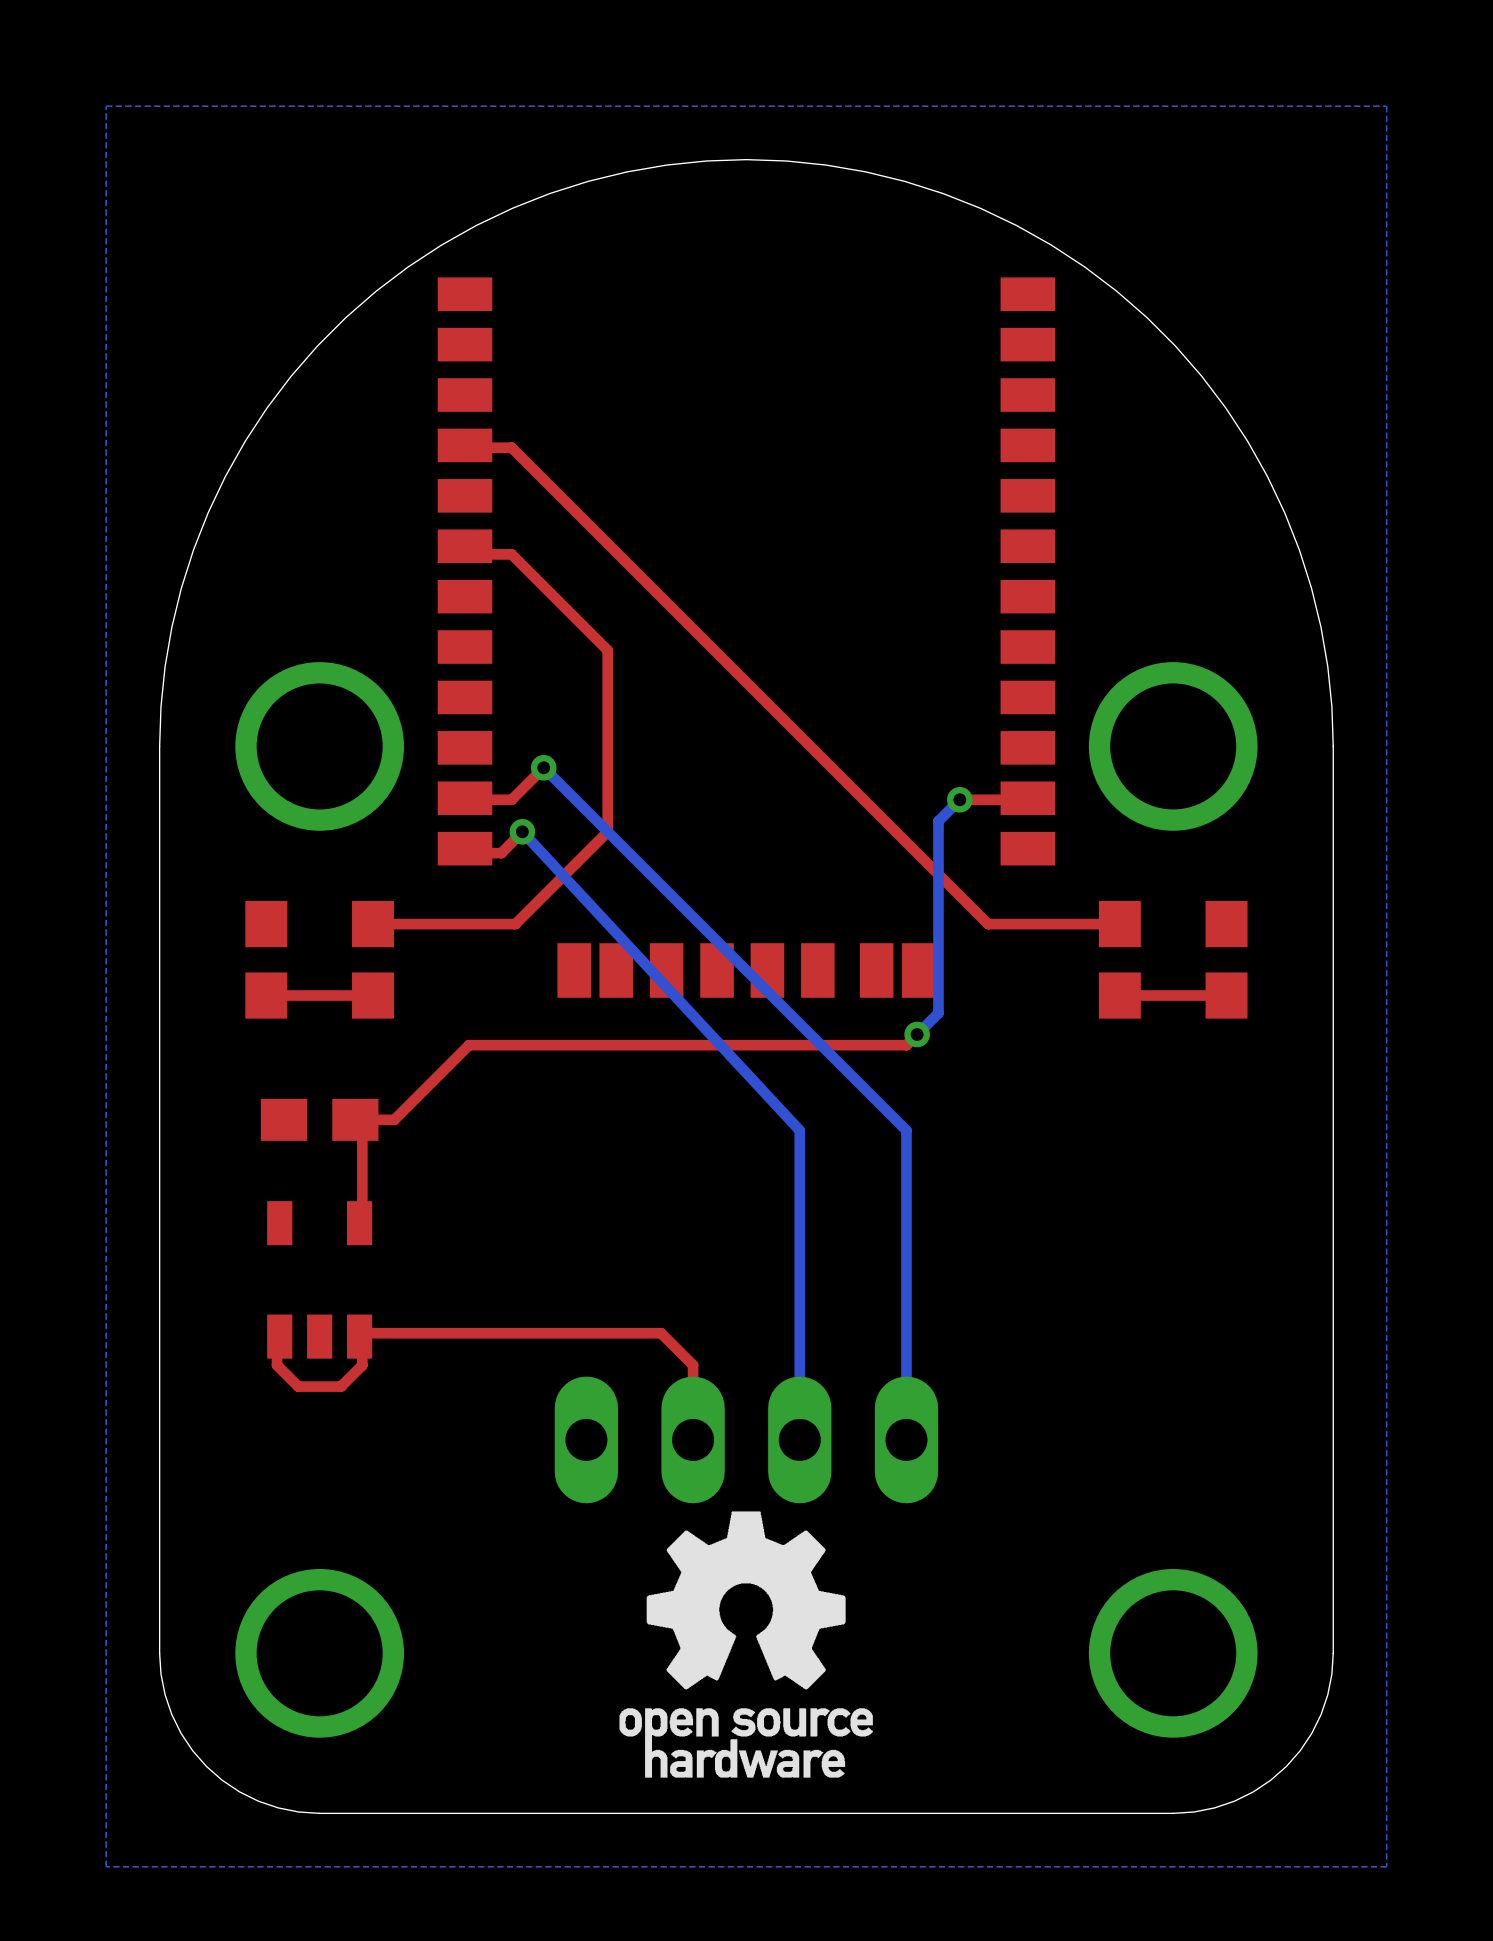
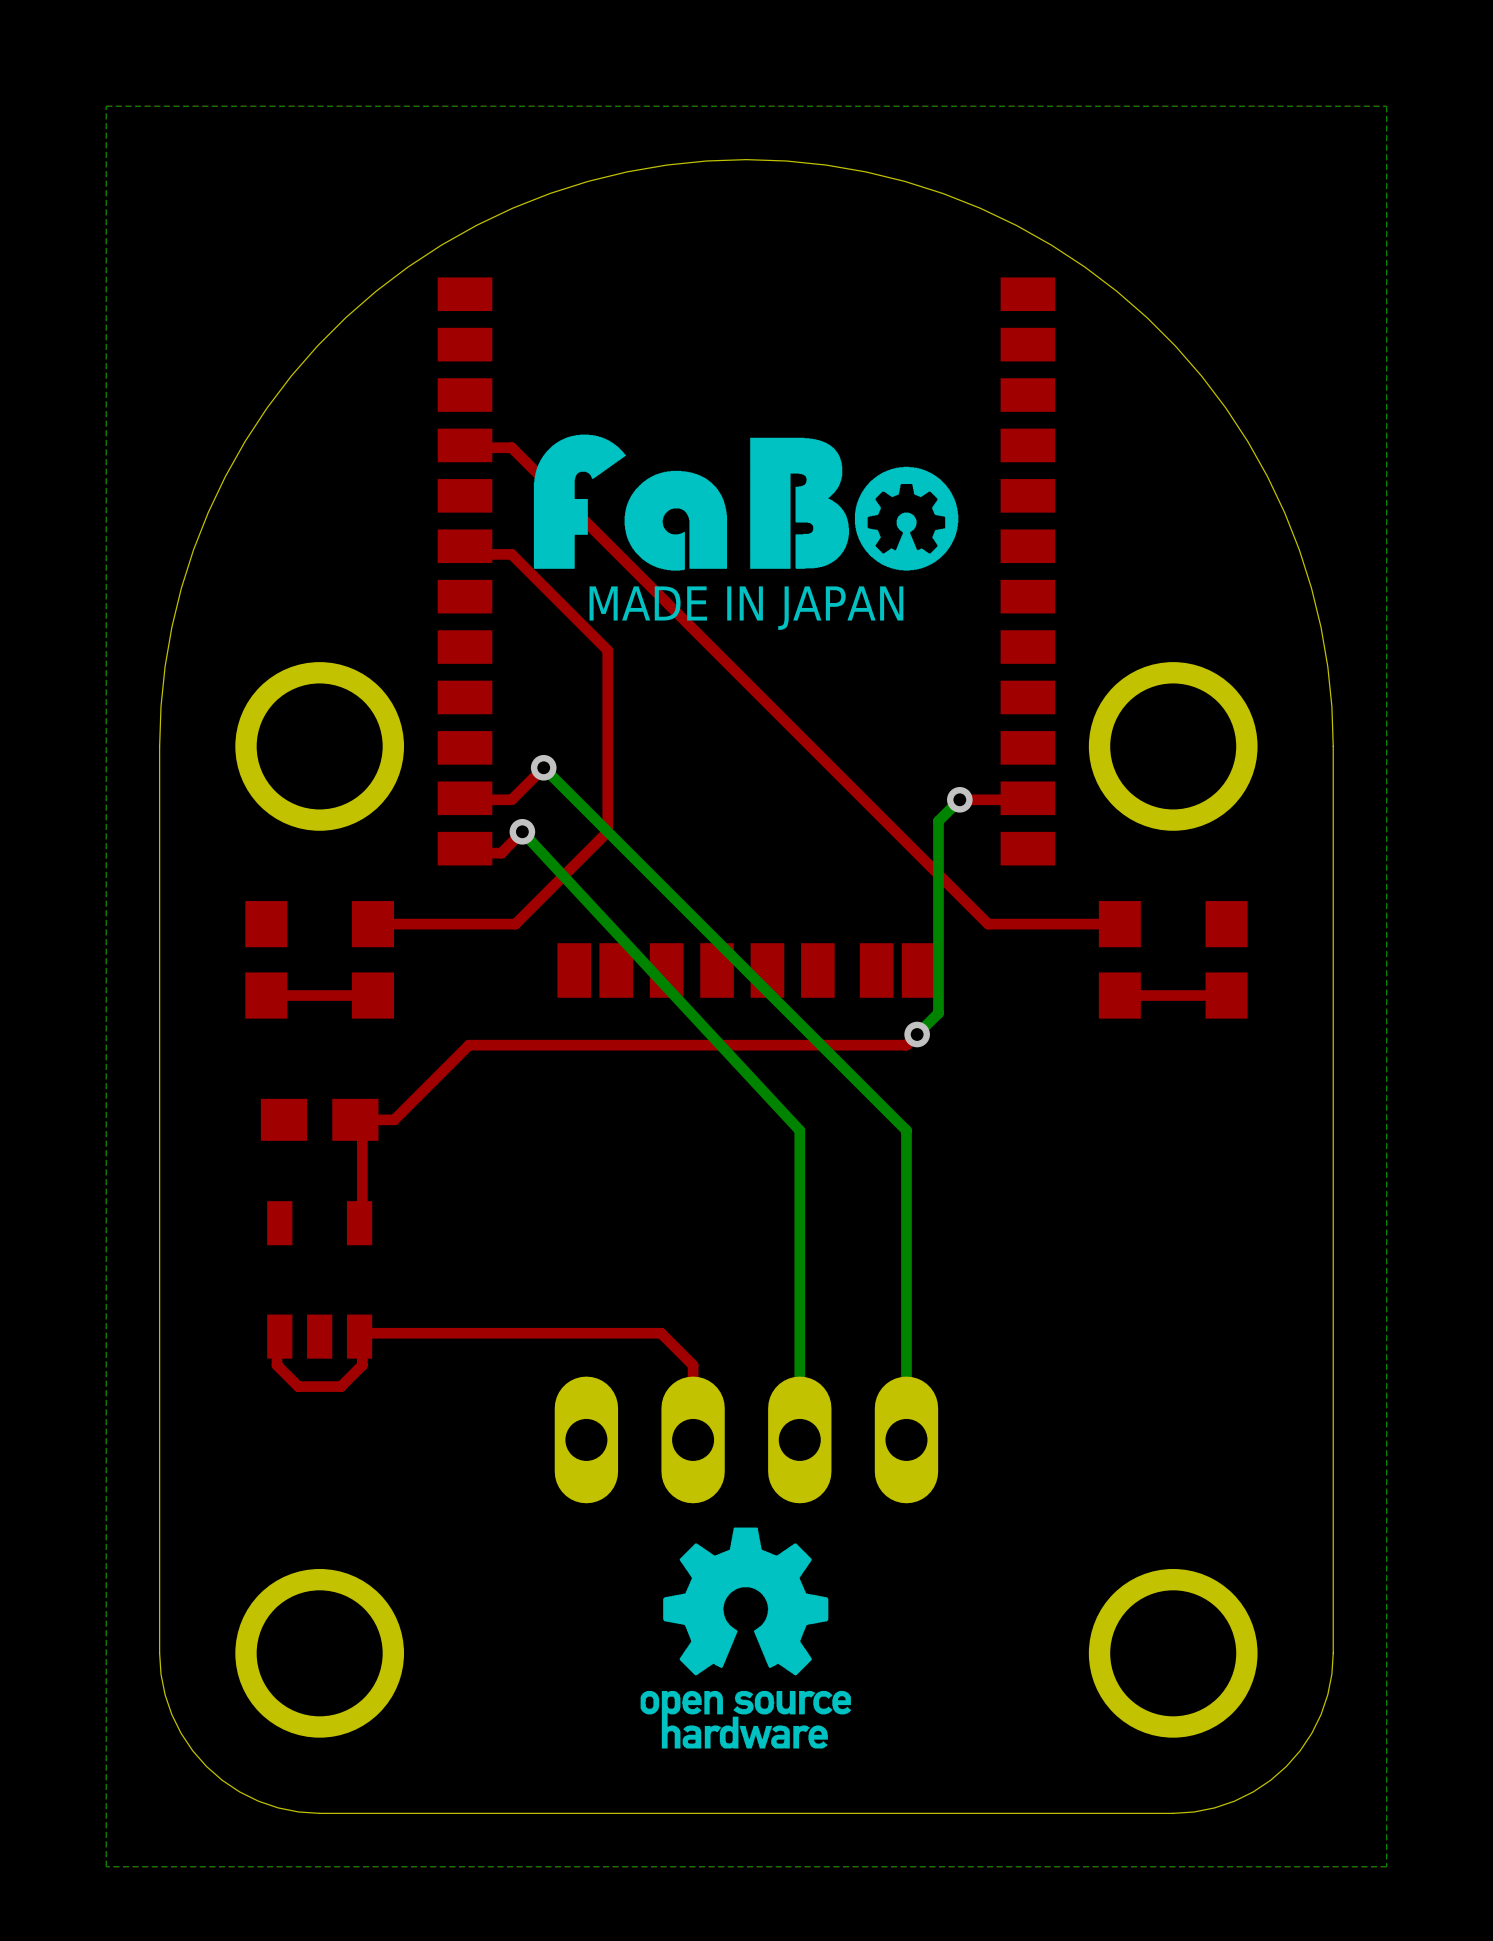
drawing: none -> [533, 434, 959, 571]
text: none -> MADE IN JAPAN (746, 608)
drawing shape: [619, 1511, 873, 1778] -> [640, 1527, 851, 1749]

